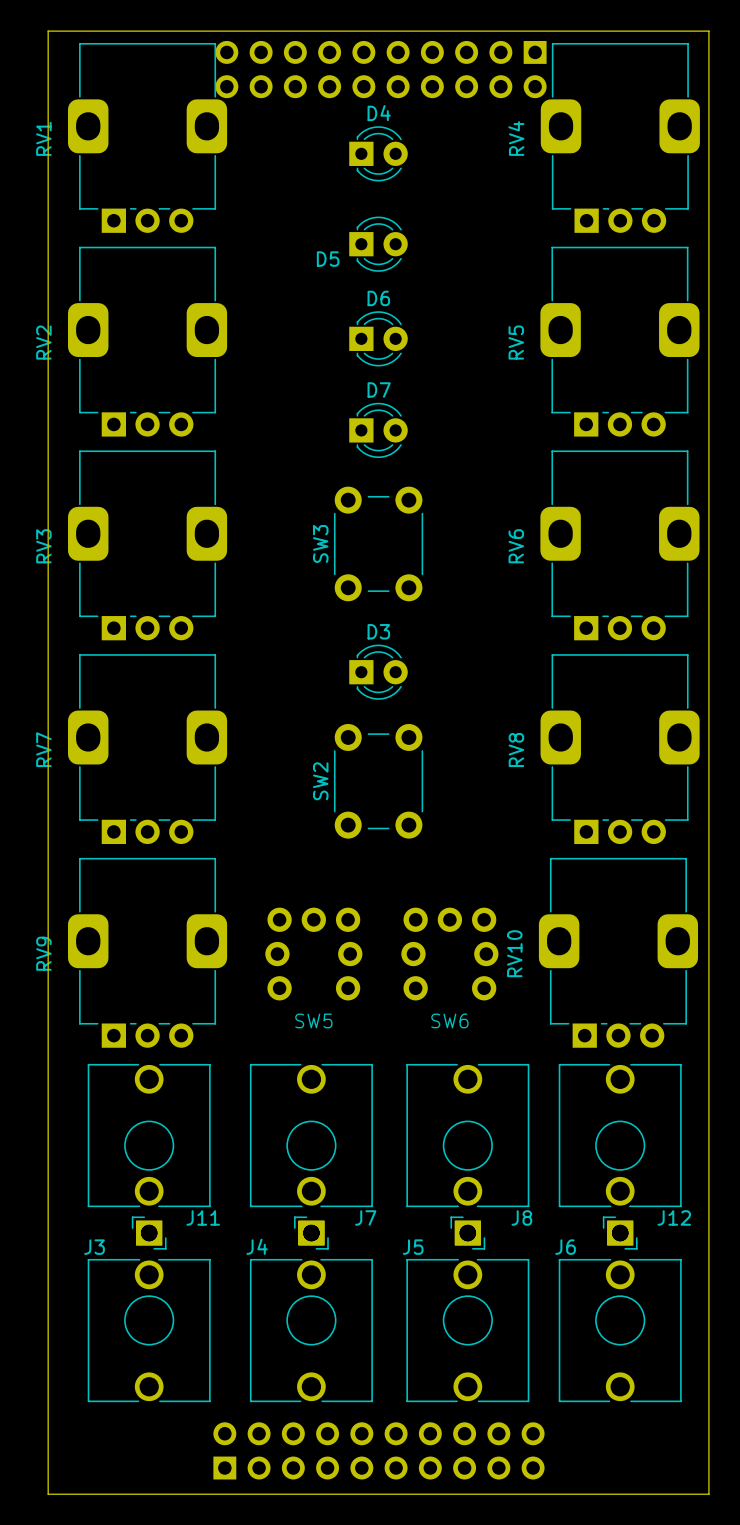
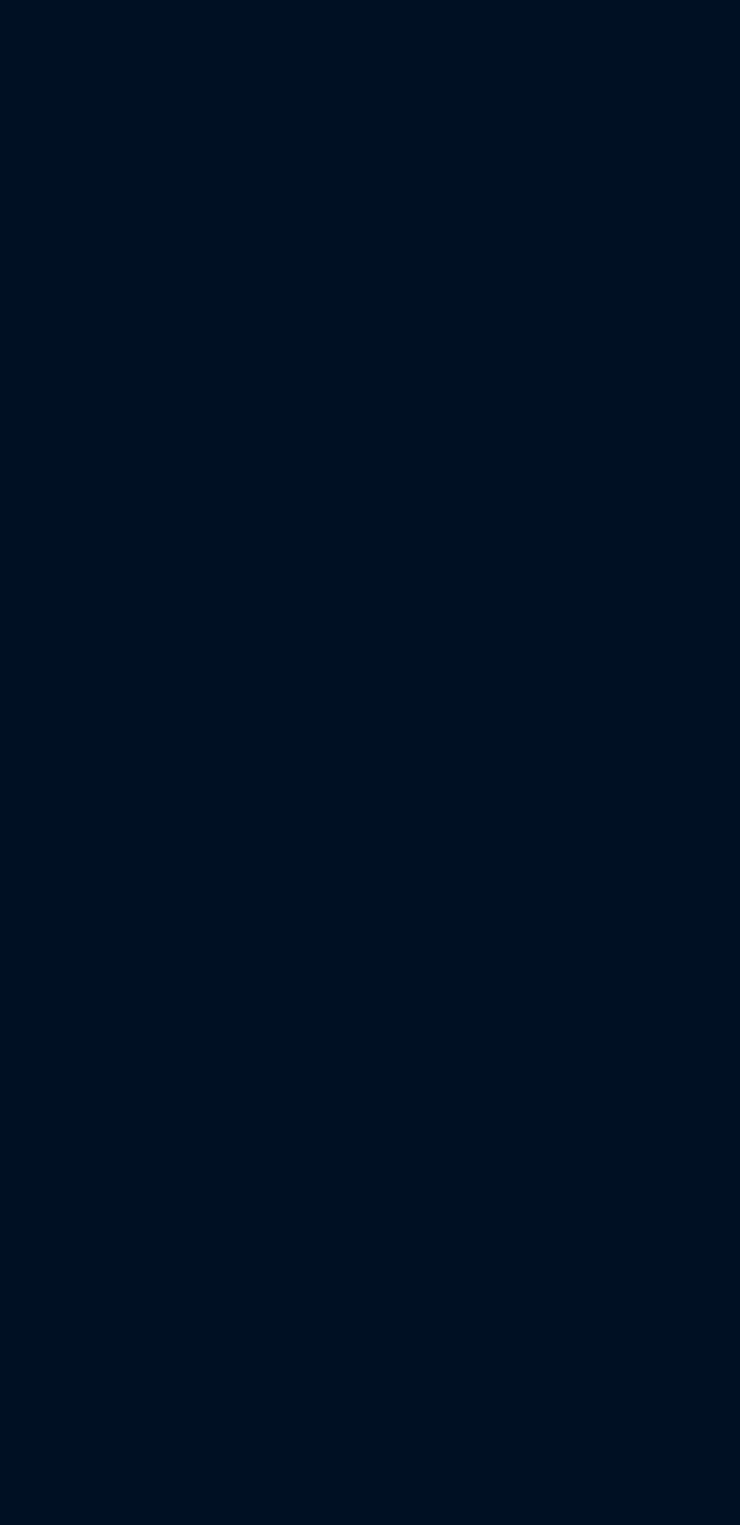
board edge: (48, 31) (708, 31) (708, 1494) (48, 1494) (48, 31) -> none
part: (380, 69) -> none
RV1: (147, 137) -> none
RV4: (620, 137) -> none
D4: (378, 153) -> none
D5: (378, 244) -> none
D6: (378, 338) -> none
RV2: (147, 341) -> none
RV5: (619, 341) -> none
D7: (378, 430) -> none
SW3: (378, 543) -> none
RV3: (147, 545) -> none
RV6: (619, 545) -> none
D3: (378, 672) -> none
RV7: (147, 749) -> none
RV8: (620, 749) -> none
SW2: (378, 781) -> none
RV9: (147, 952) -> none
RV10: (618, 952) -> none
SW5: (313, 954) -> none
SW6: (449, 954) -> none
J11: (149, 1156) -> none
J7: (311, 1156) -> none
J8: (467, 1156) -> none
J12: (620, 1156) -> none
J3: (149, 1309) -> none
J4: (311, 1309) -> none
J5: (467, 1309) -> none
J6: (620, 1309) -> none
part: (378, 1450) -> none

